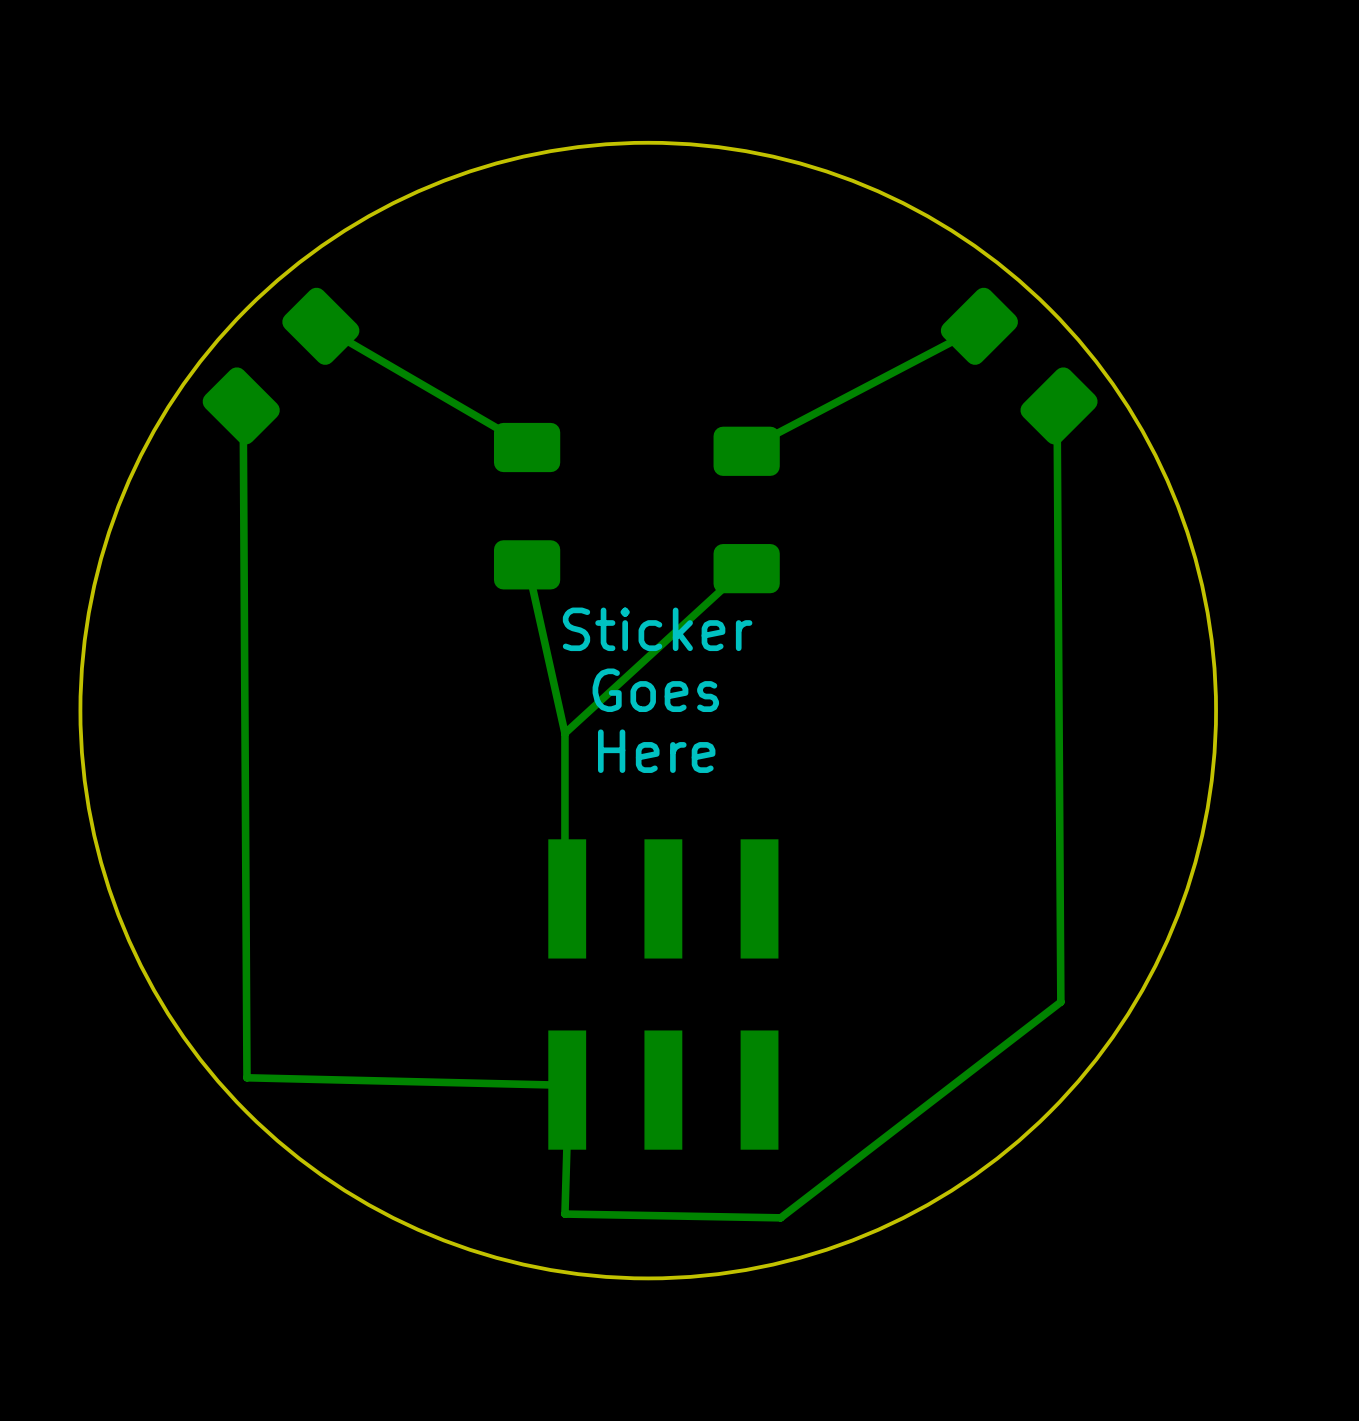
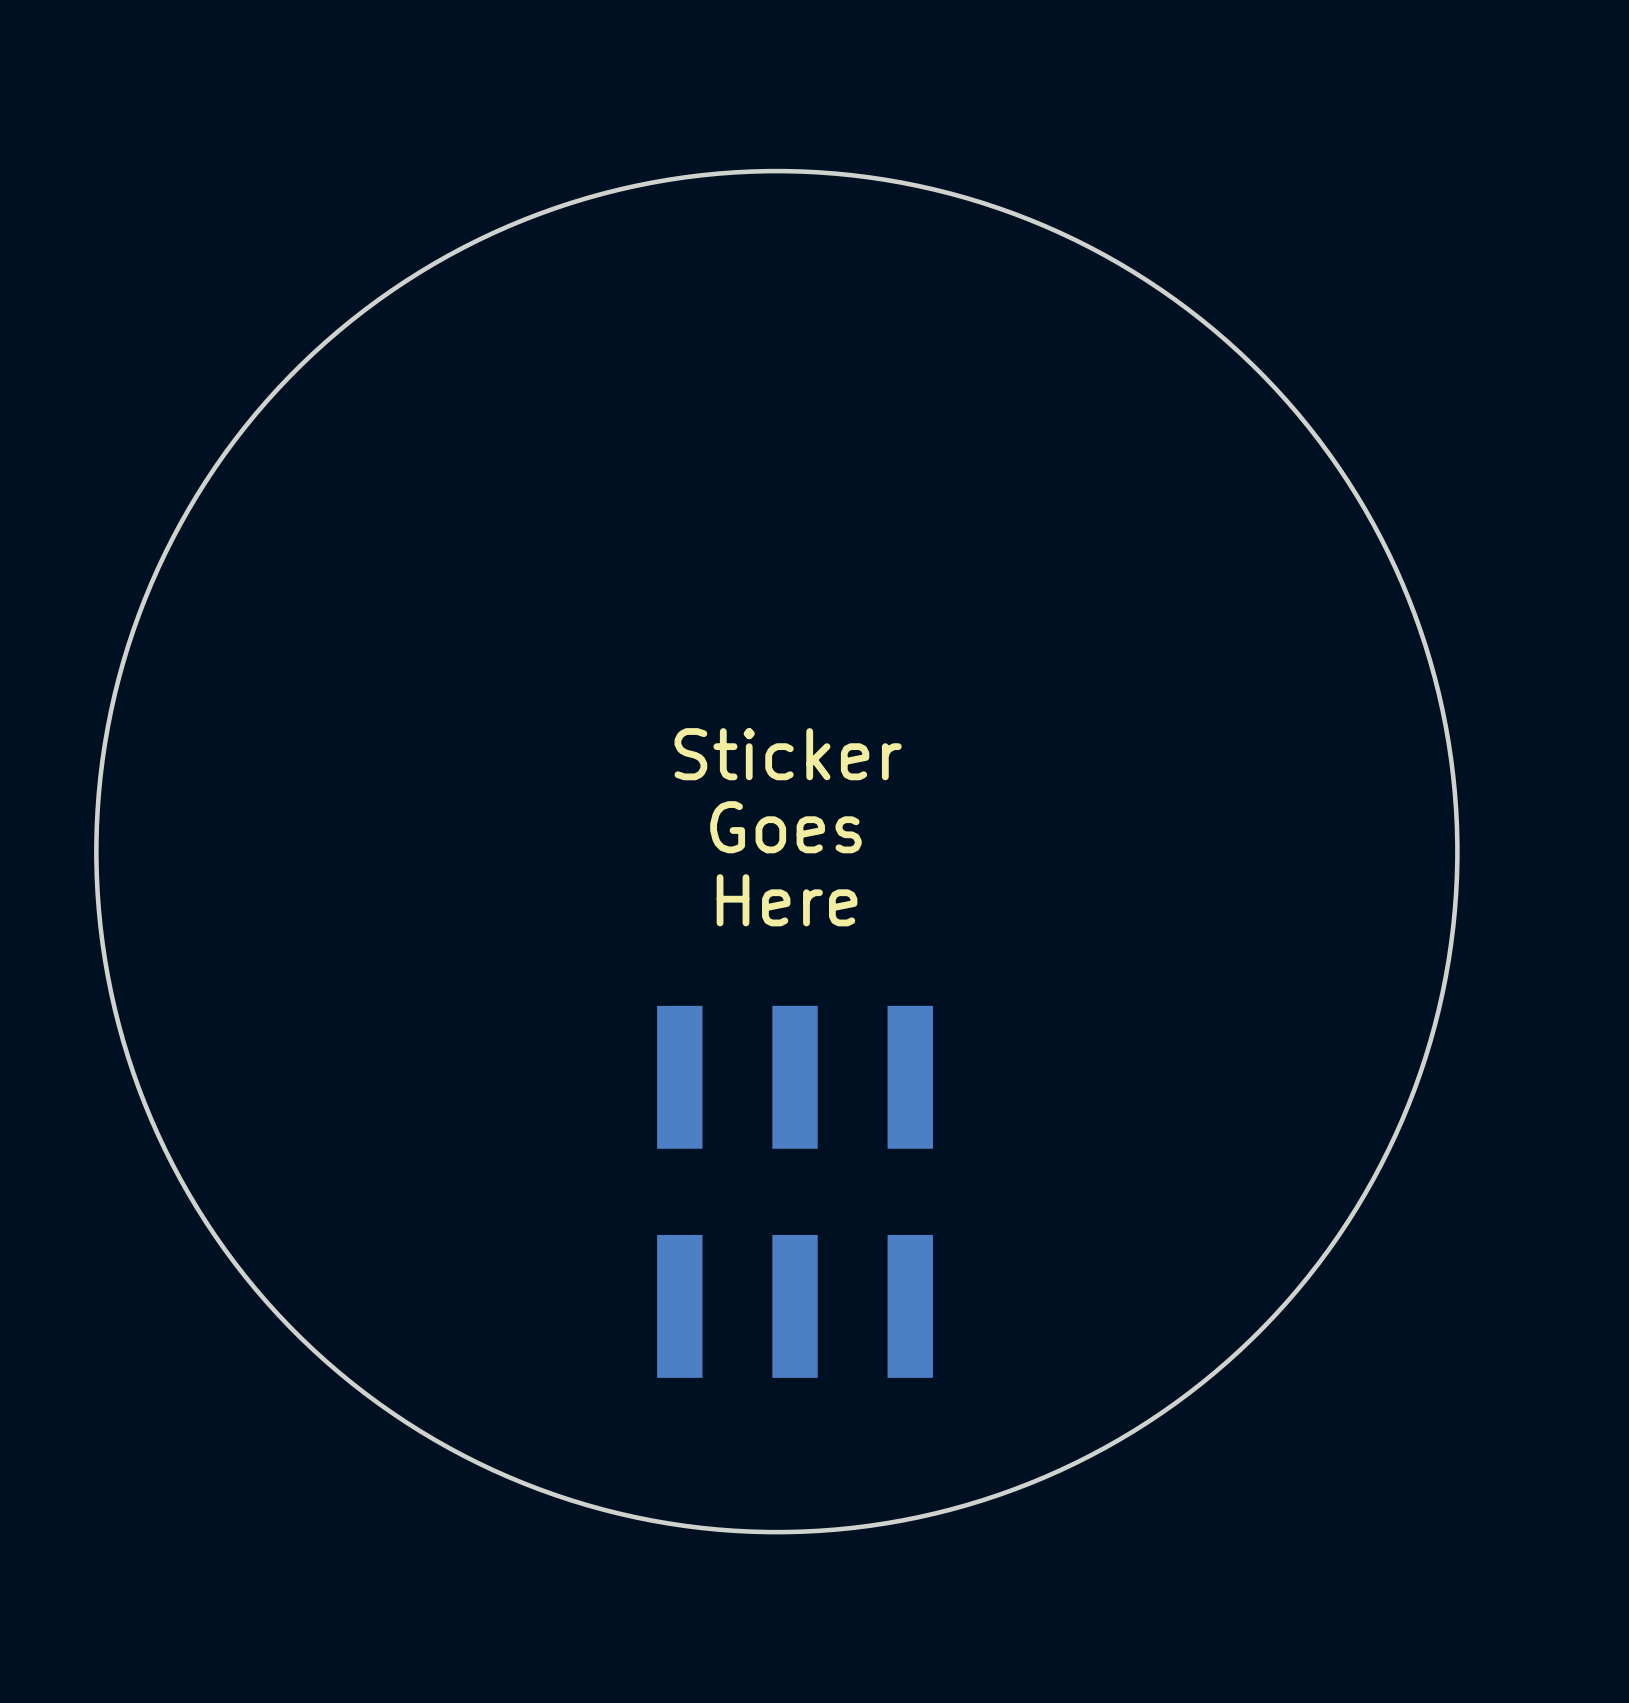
bottom track: (318, 324) (527, 445) -> none
bottom track: (985, 324) (746, 449) -> none
part: (281, 366) -> none
part: (1019, 366) -> none
bottom track: (1057, 403) (1060, 1002) (780, 1217) (564, 1214) (568, 1085) (246, 1077) (243, 407) -> none
part: (527, 506) -> none
part: (746, 509) -> none
bottom track: (527, 562) (564, 733) -> none
bottom track: (742, 570) (564, 733) -> none
bottom track: (564, 733) (564, 896) -> none

